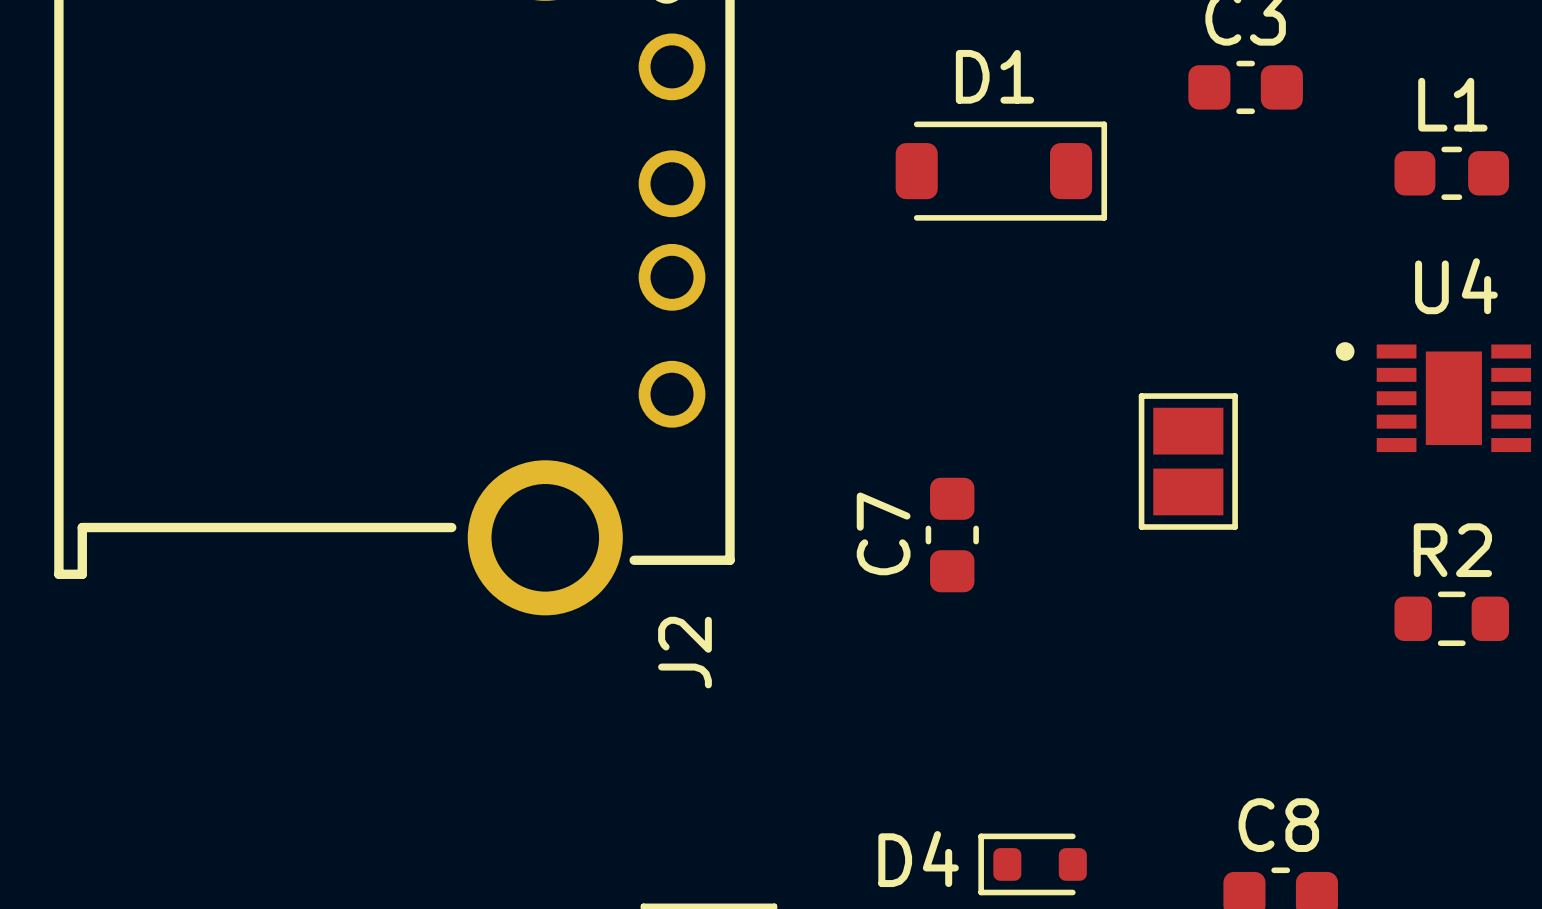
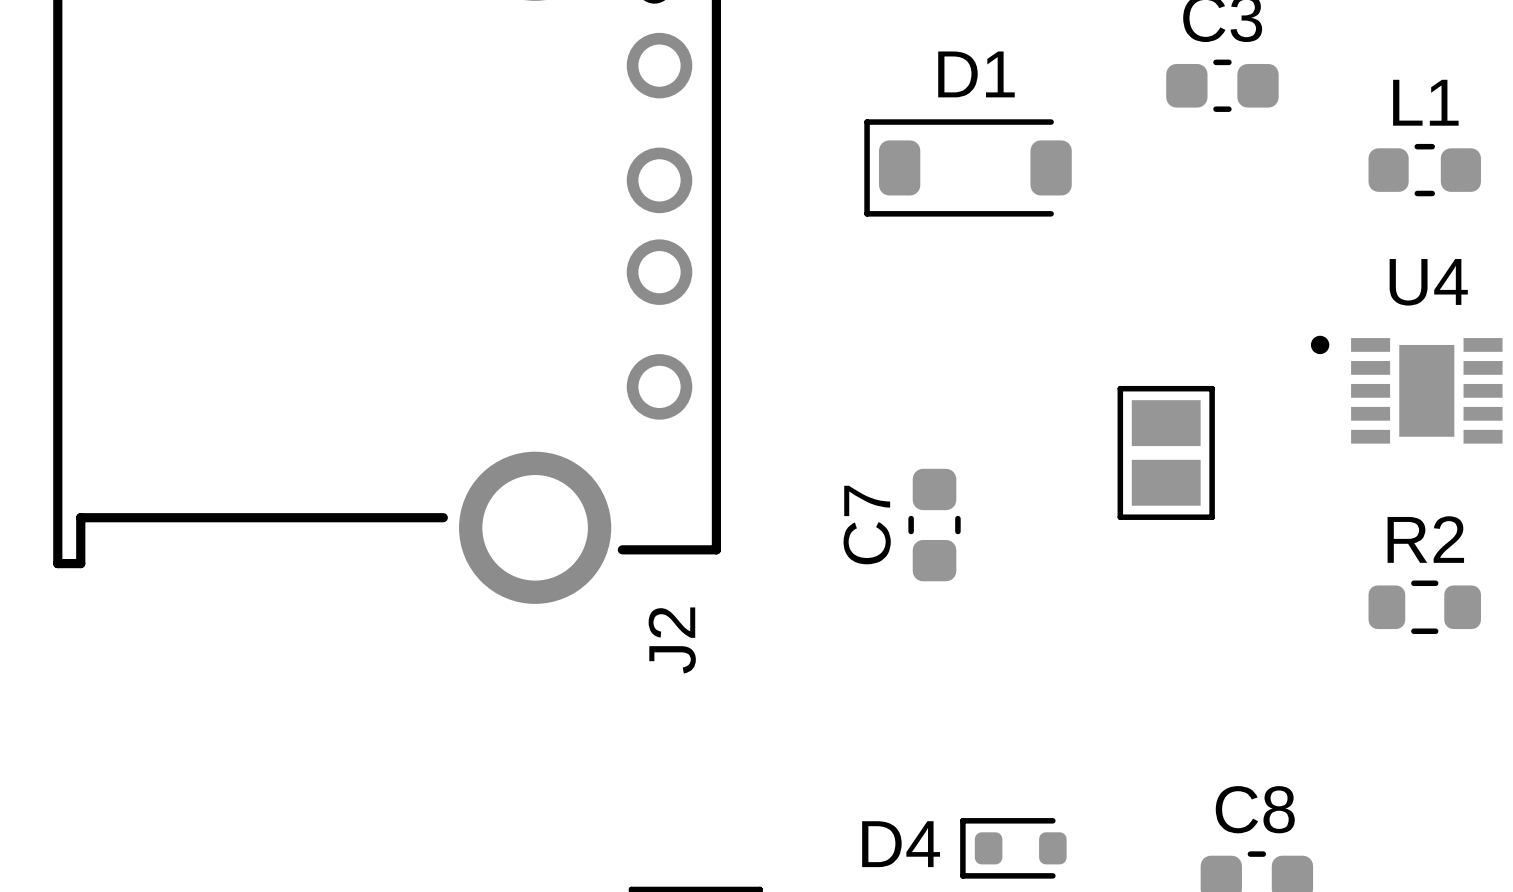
D1 rotation: 0° (1001, 171) -> 180° (968, 167)

